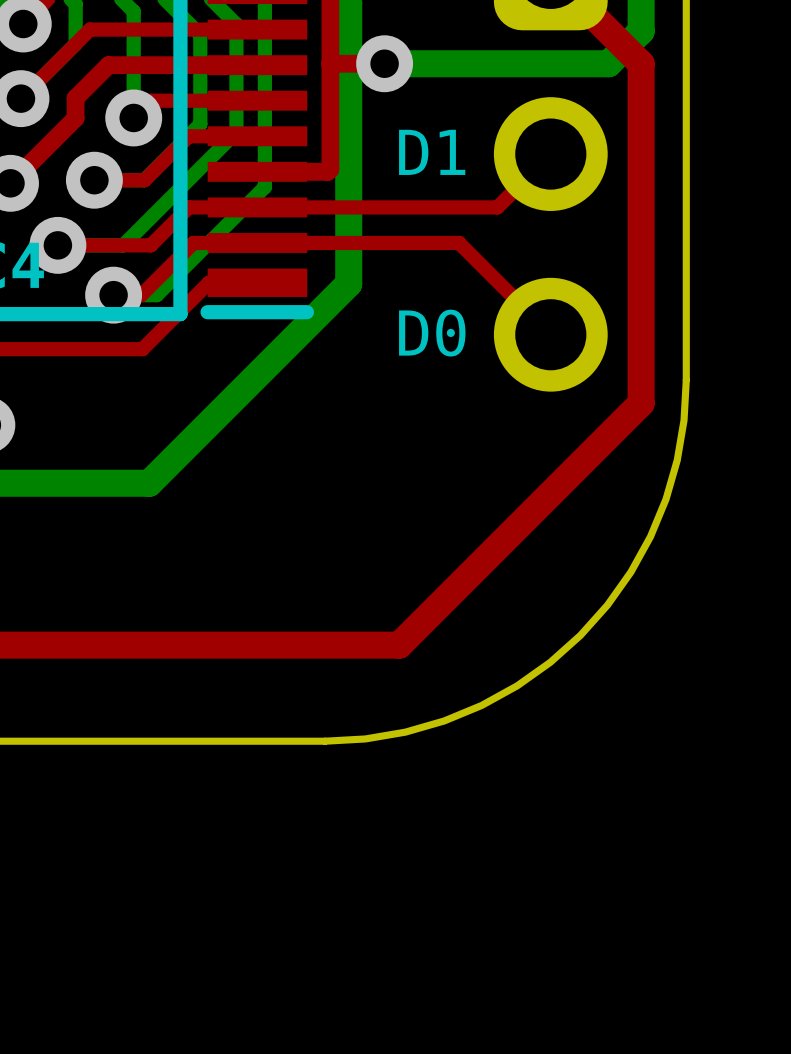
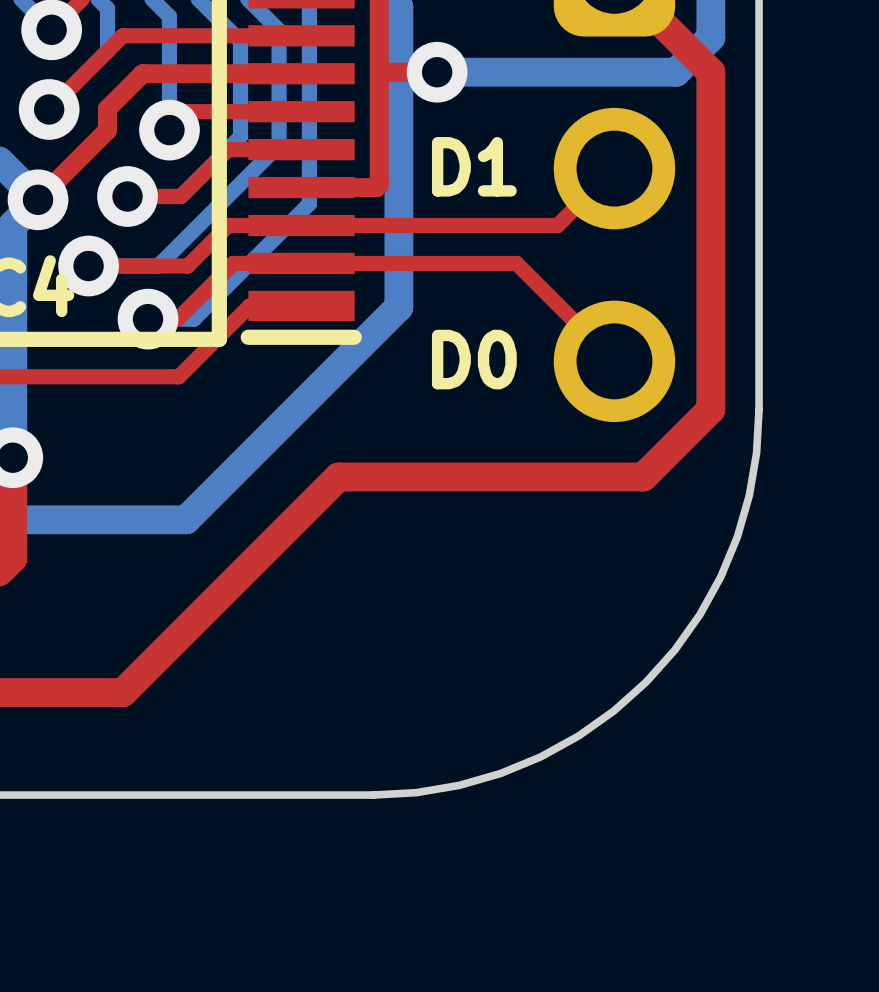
top track: (641, 379) (641, 403) (399, 645) (90, 645) -> (710, 409) (643, 477) (338, 477) (122, 692)

